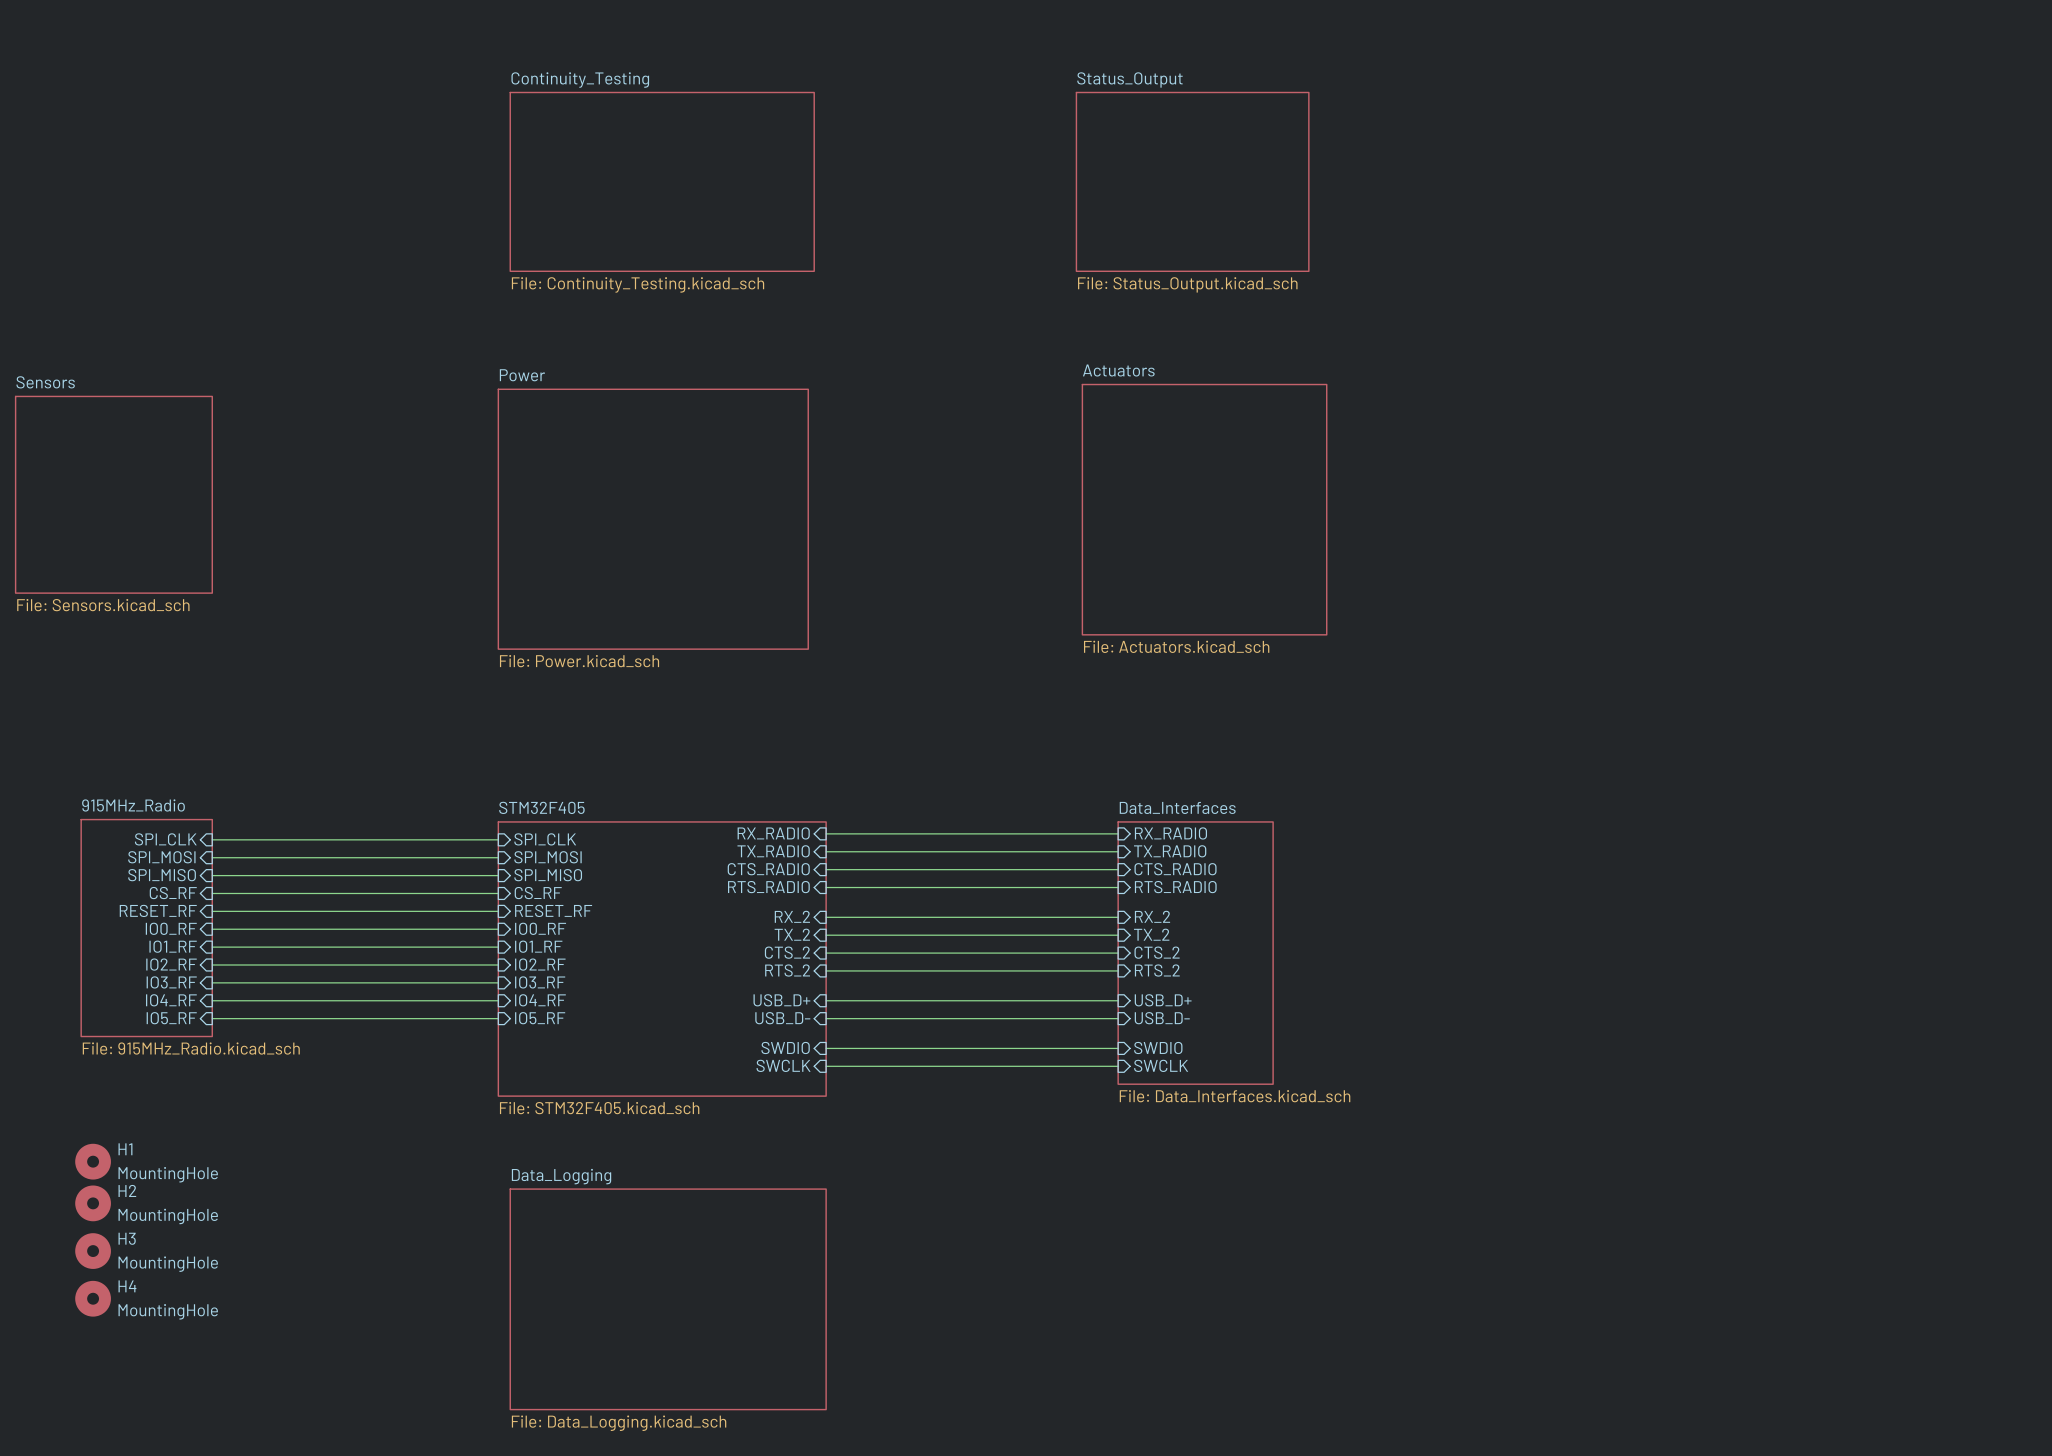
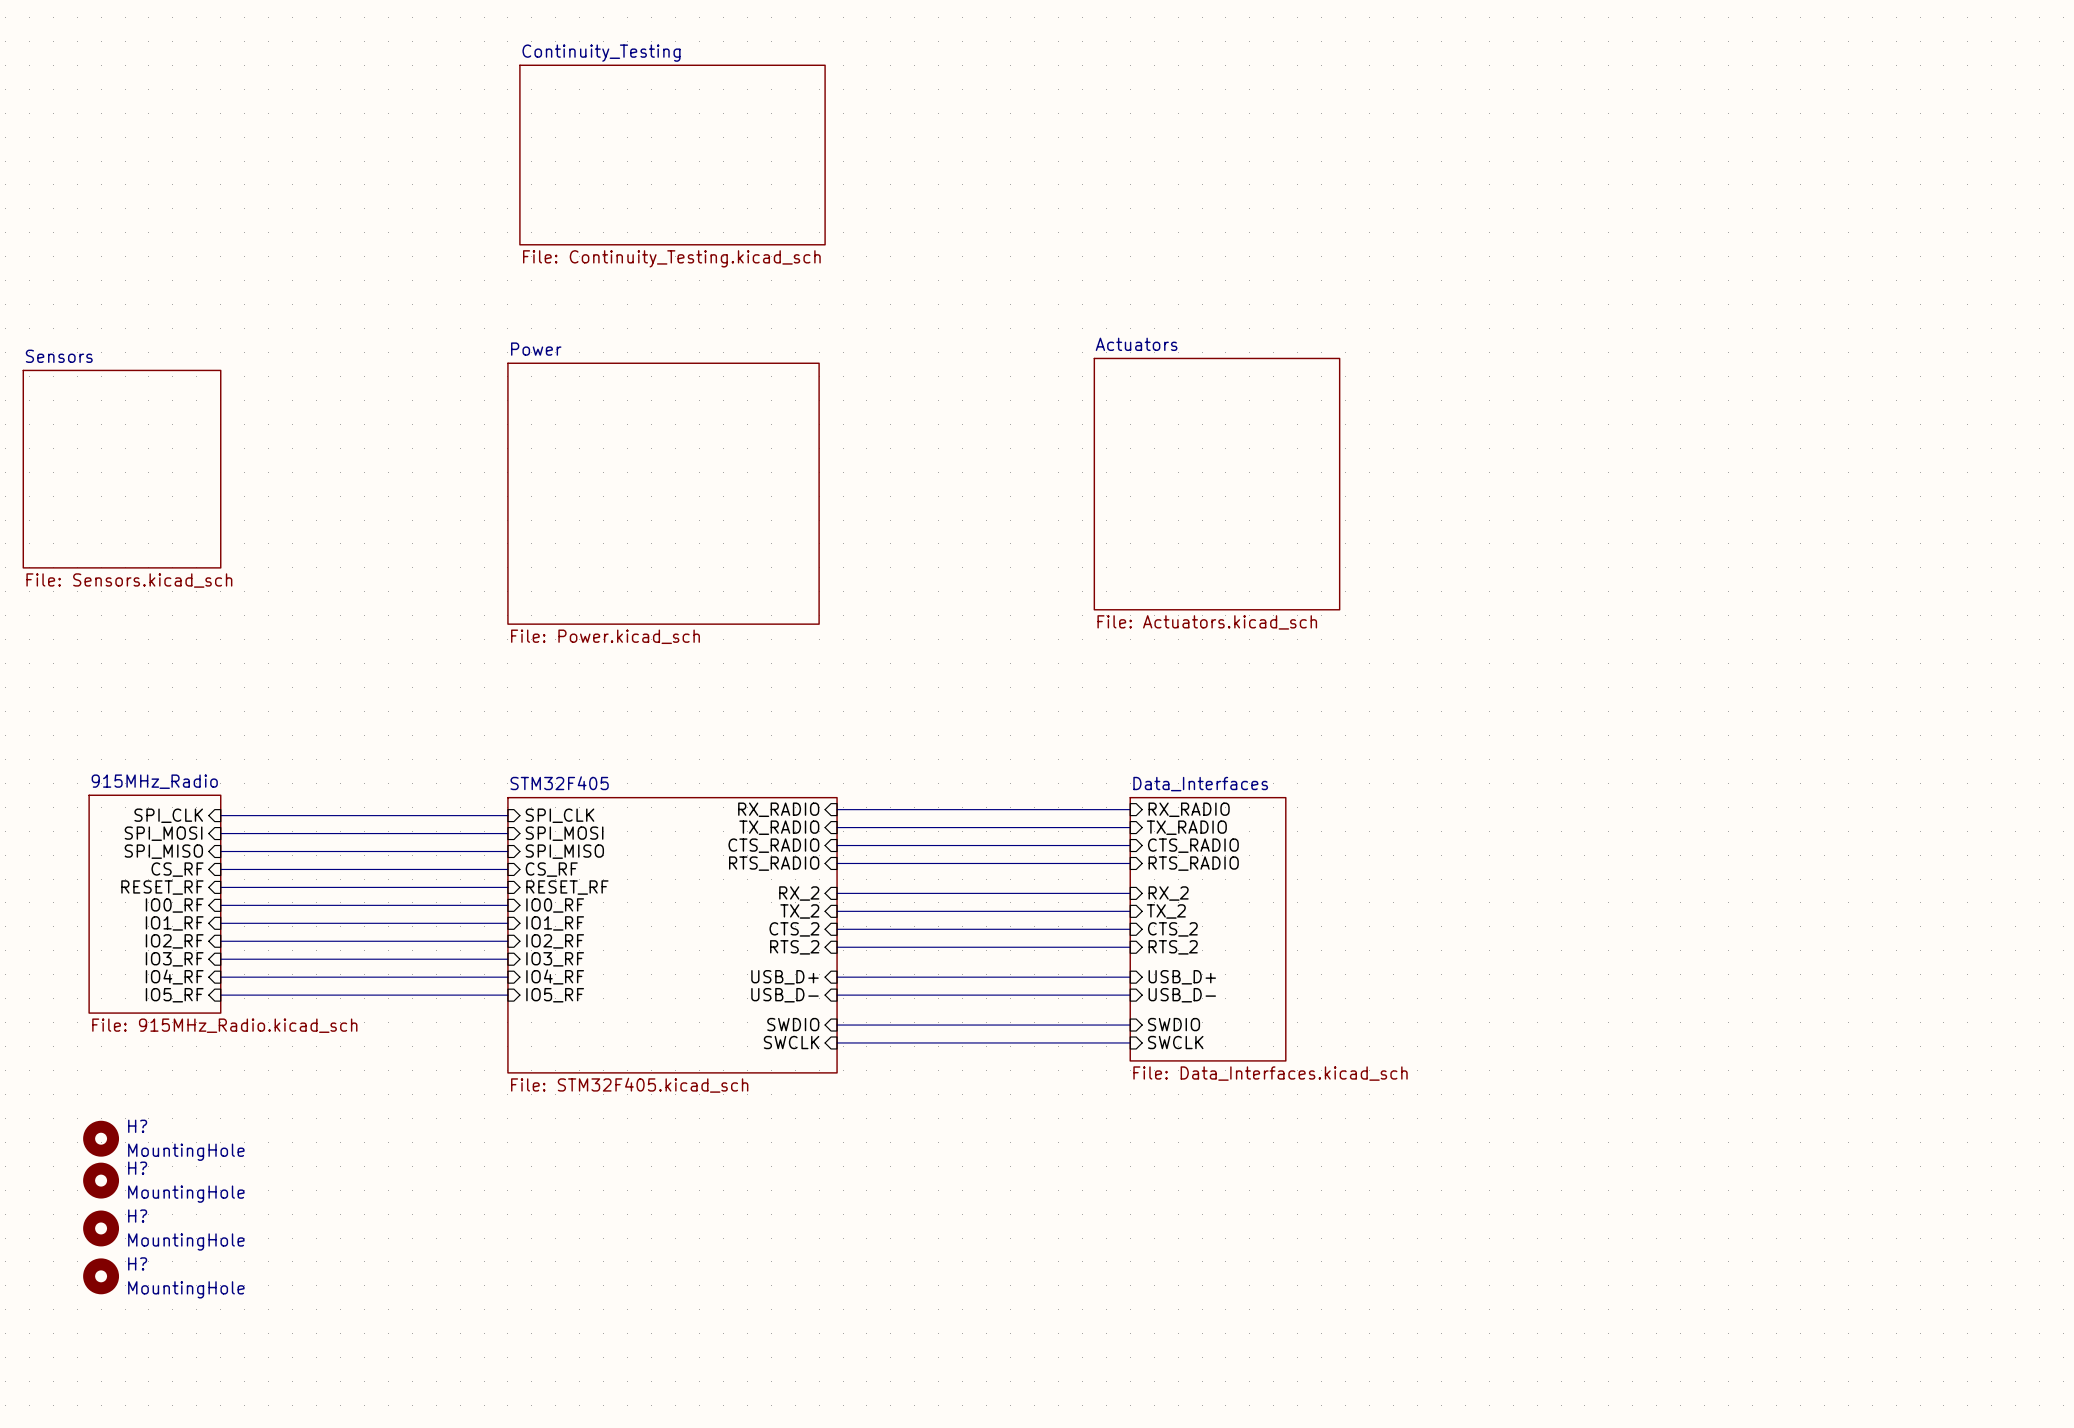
sheet Status_Output: File: Status_Output.kicad_sch (1192, 181) -> none
H1 name: H1 (125, 1149) -> H? (137, 1126)
H2 name: H2 (127, 1190) -> H? (137, 1168)
H3 name: H3 (127, 1238) -> H? (137, 1216)
H4 name: H4 (127, 1286) -> H? (137, 1263)
sheet Data_Logging: File: Data_Logging.kicad_sch (668, 1299) -> none

